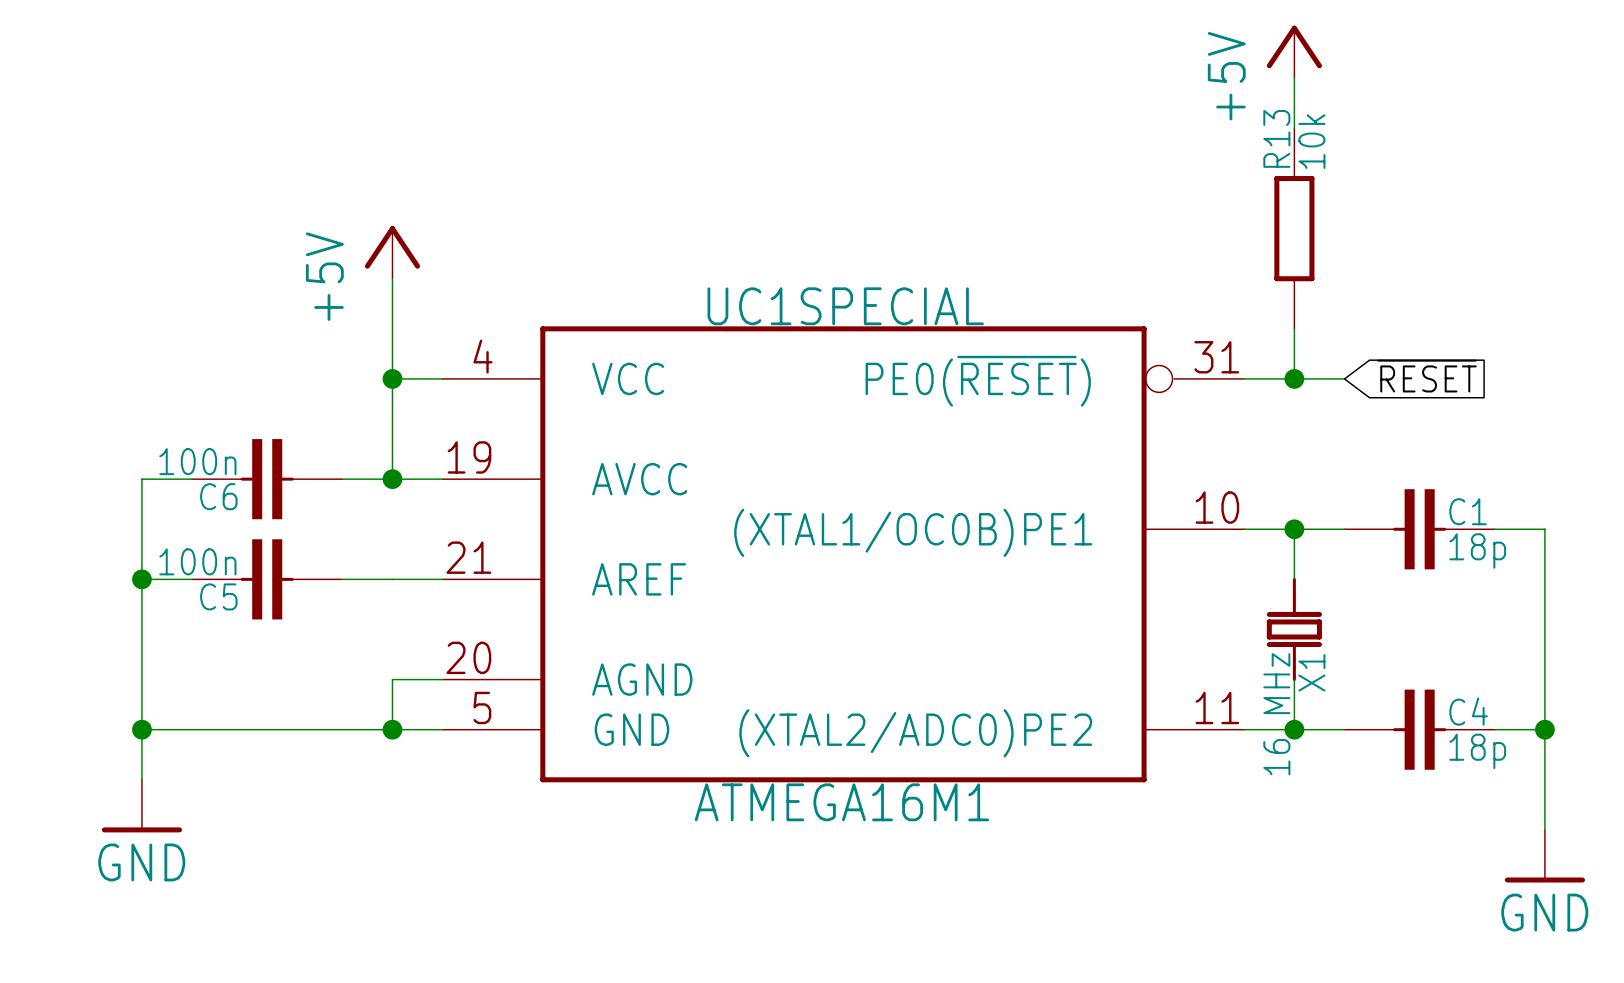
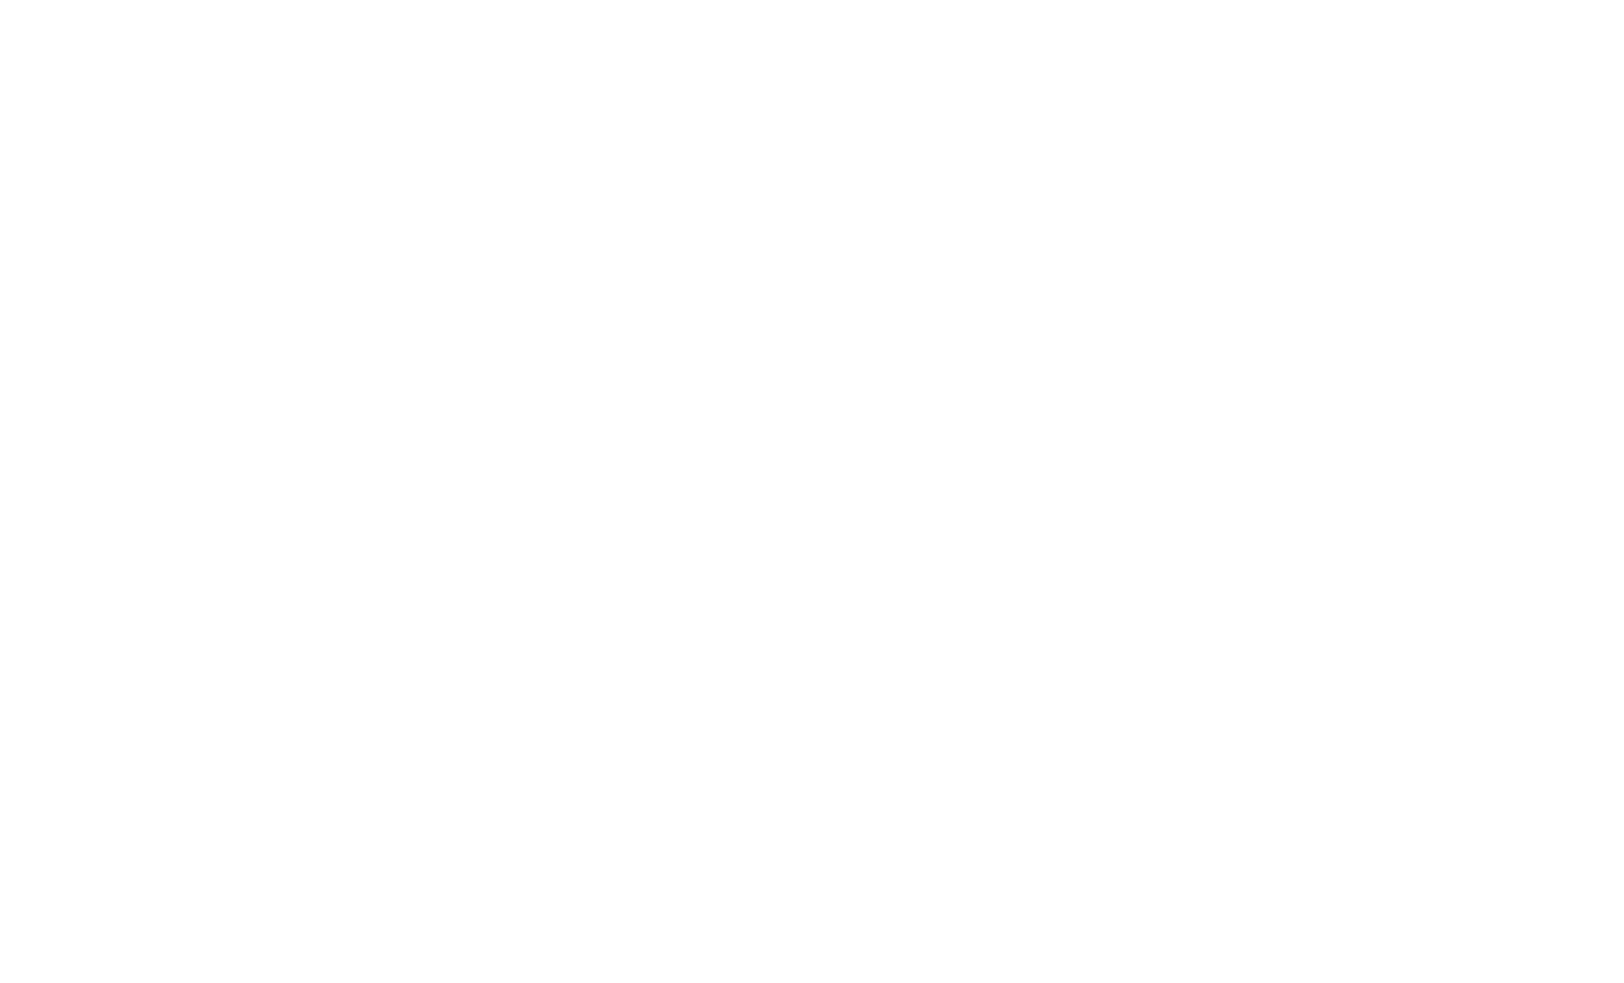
power symbol: +5V (1294, 52) -> none
wire: (1294, 78) (1294, 128) -> none
R13: 10k (1294, 228) -> none
power symbol: +5V (392, 252) -> none
wire: (392, 278) (392, 479) -> none
wire: (1294, 328) (1294, 378) -> none
global label: ~{RESET} (1426, 376) -> none
wire: (392, 378) (442, 378) -> none
junction: (392, 378) -> none
wire: (1244, 378) (1344, 378) -> none
junction: (1294, 378) -> none
wire: (192, 479) (141, 479) (141, 779) -> none
C6: 100n (267, 479) -> none
wire: (342, 479) (442, 479) -> none
junction: (392, 479) -> none
wire: (1244, 529) (1344, 529) -> none
wire: (1294, 529) (1294, 579) -> none
junction: (1294, 529) -> none
C1: 18p (1419, 529) -> none
wire: (1494, 529) (1544, 529) (1544, 829) -> none
UC1SPECIAL: ATMEGA16M1 (843, 554) -> none
wire: (141, 579) (192, 579) -> none
junction: (141, 579) -> none
C5: 100n (267, 579) -> none
wire: (342, 579) (442, 579) -> none
X1: 16 MHz (1294, 629) -> none
wire: (442, 679) (392, 679) (392, 729) -> none
wire: (1294, 679) (1294, 729) -> none
wire: (141, 729) (442, 729) -> none
junction: (141, 729) -> none
junction: (392, 729) -> none
wire: (1244, 729) (1344, 729) -> none
junction: (1294, 729) -> none
C4: 18p (1419, 729) -> none
wire: (1494, 729) (1544, 729) -> none
junction: (1544, 729) -> none
power symbol: GND (141, 806) -> none
power symbol: GND (1544, 856) -> none

